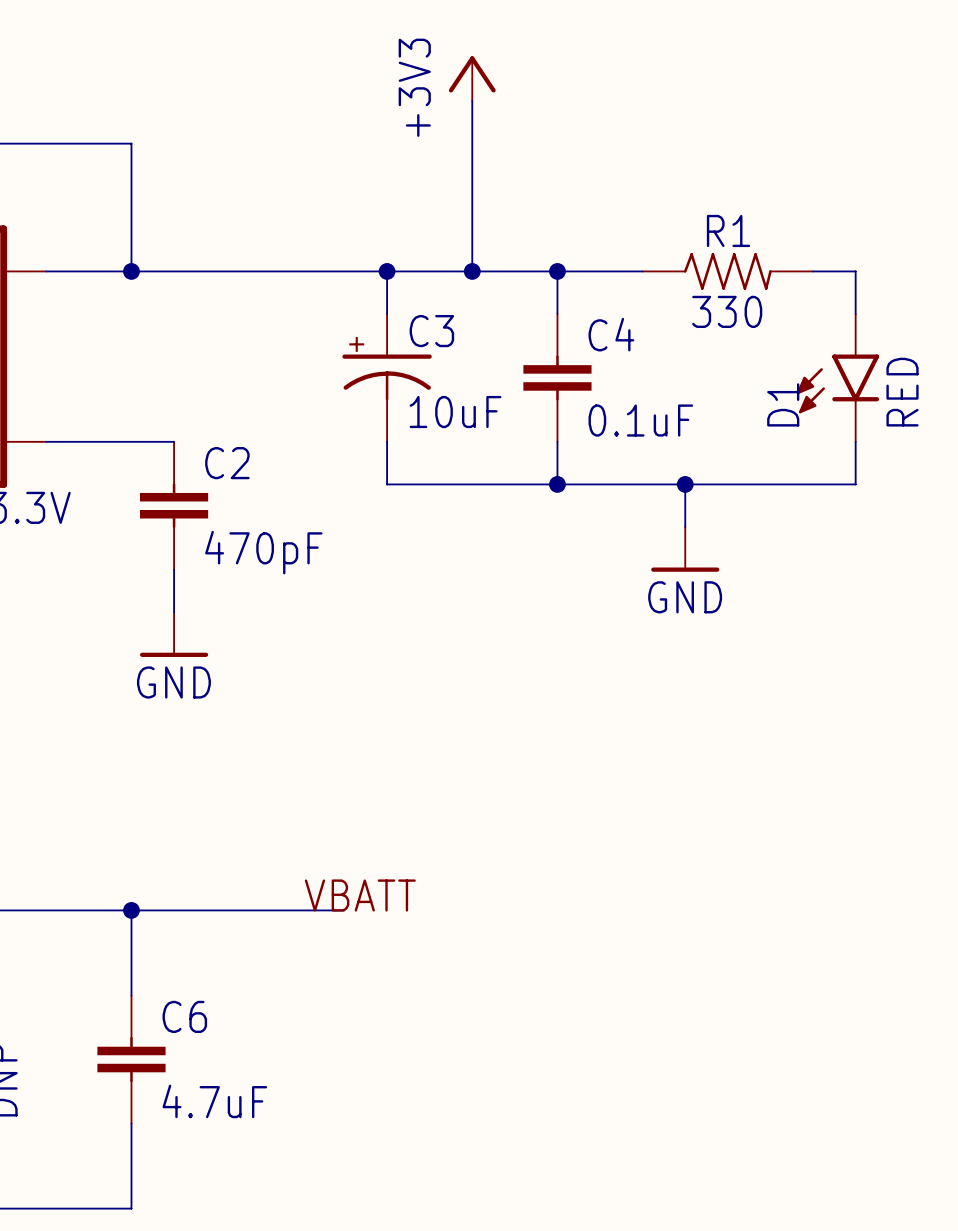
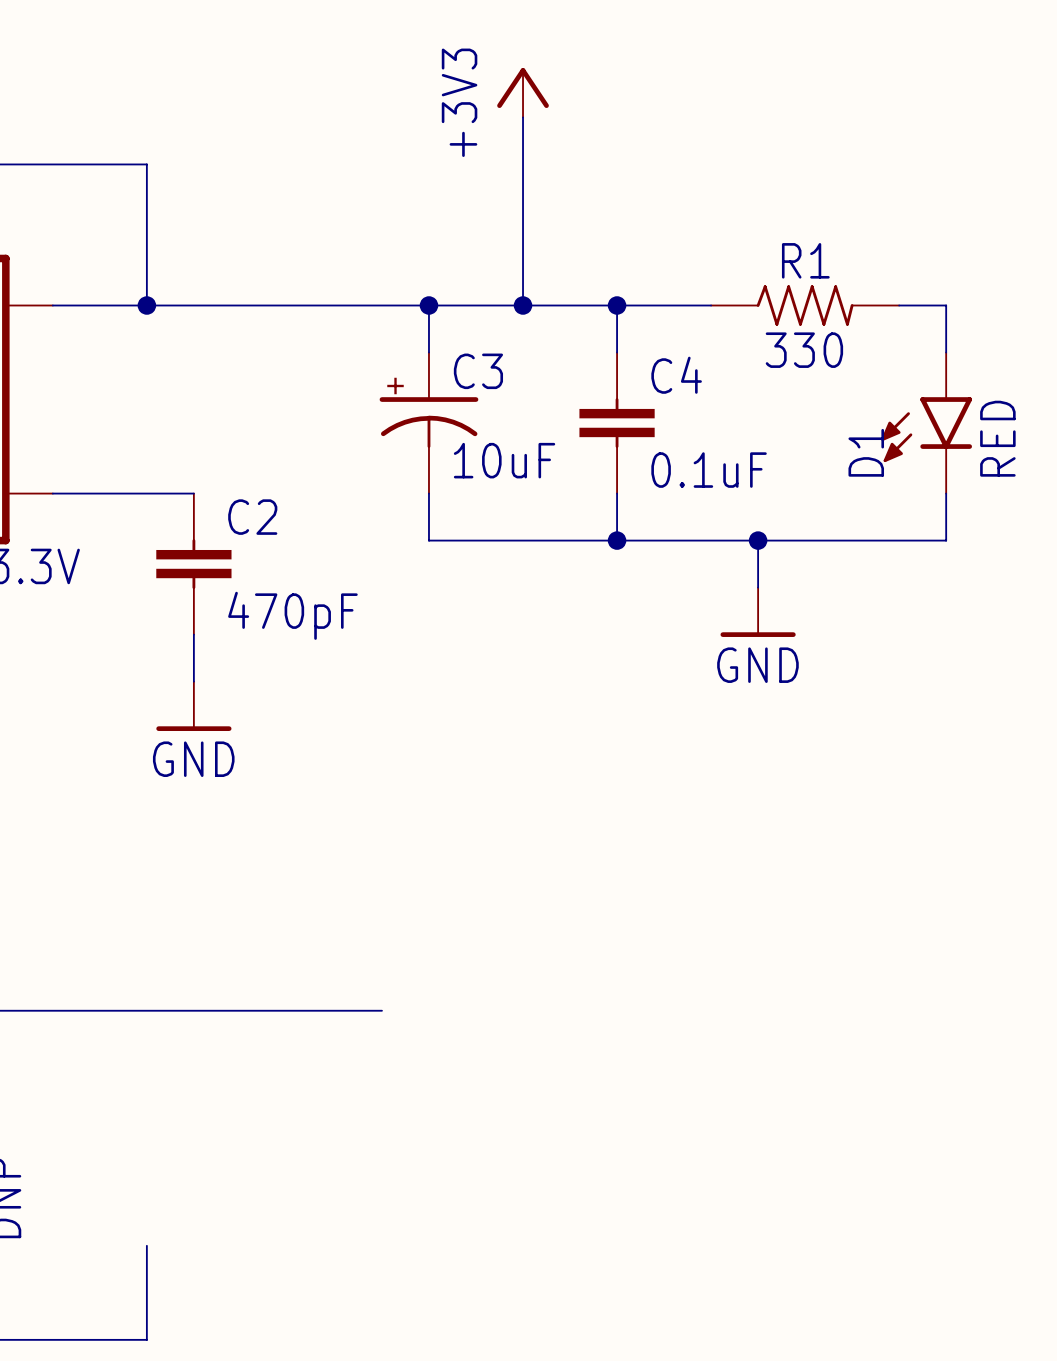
label: VBATT (360, 895) -> none
wire: (131, 910) (131, 995) -> none
junction: (131, 910) -> none
C6: 4.7uF (131, 1059) -> none

